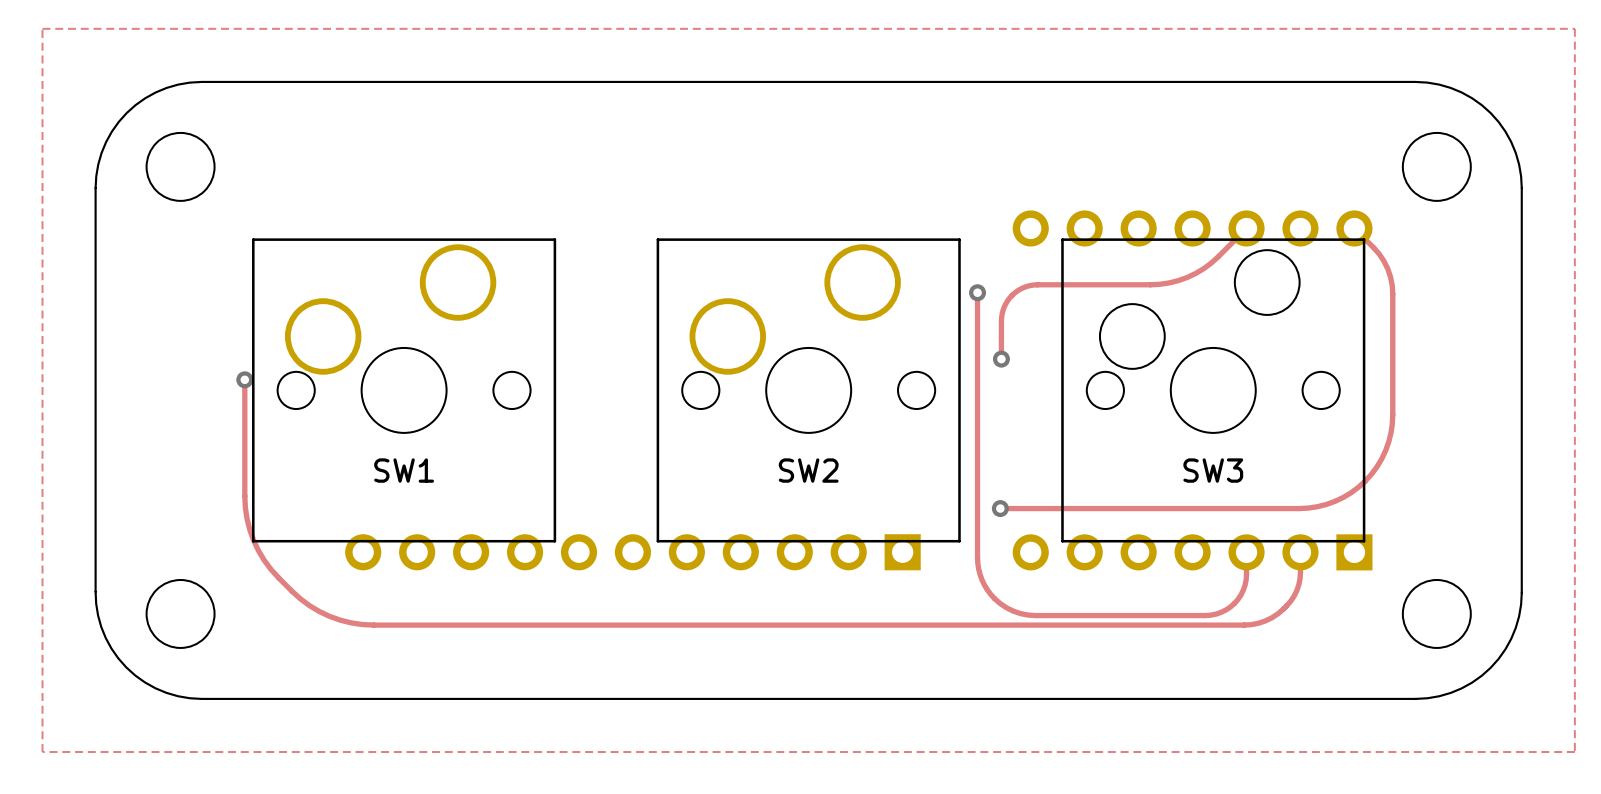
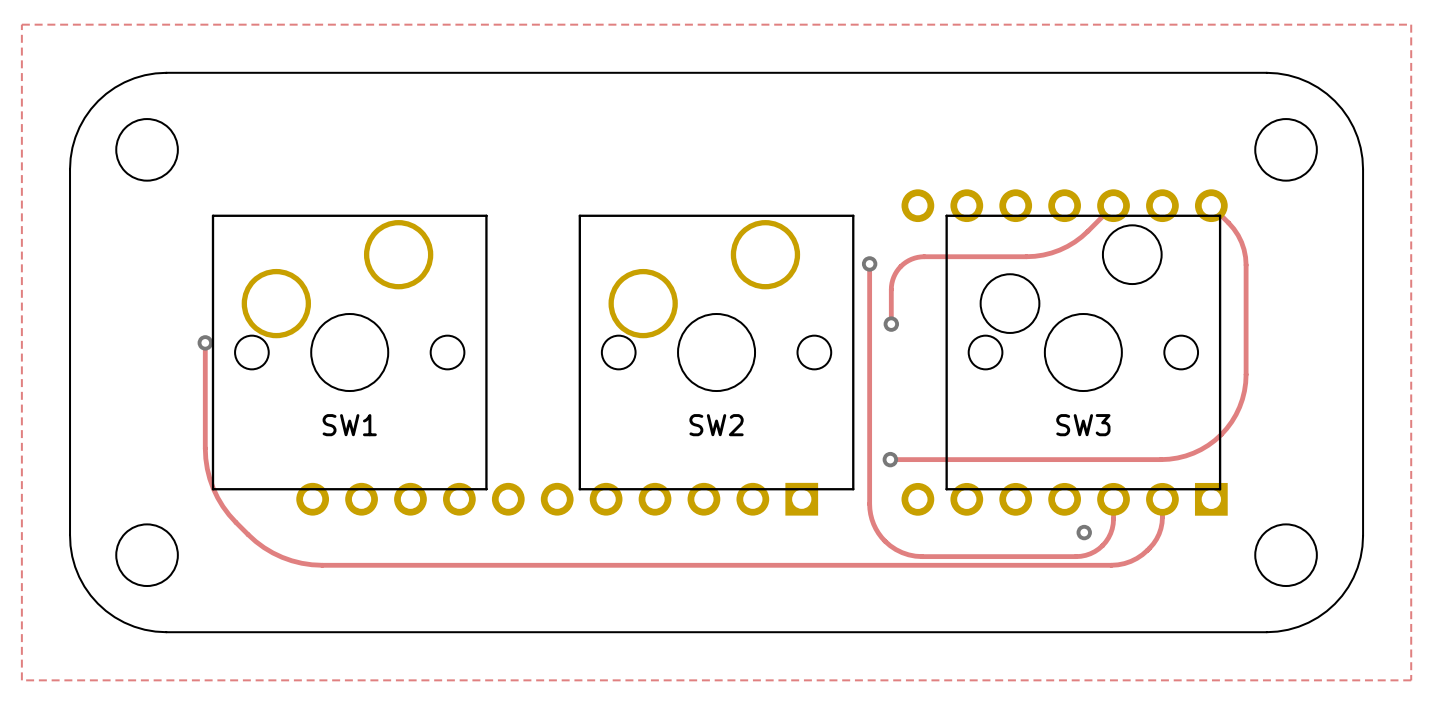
via: none -> (1084, 532)

